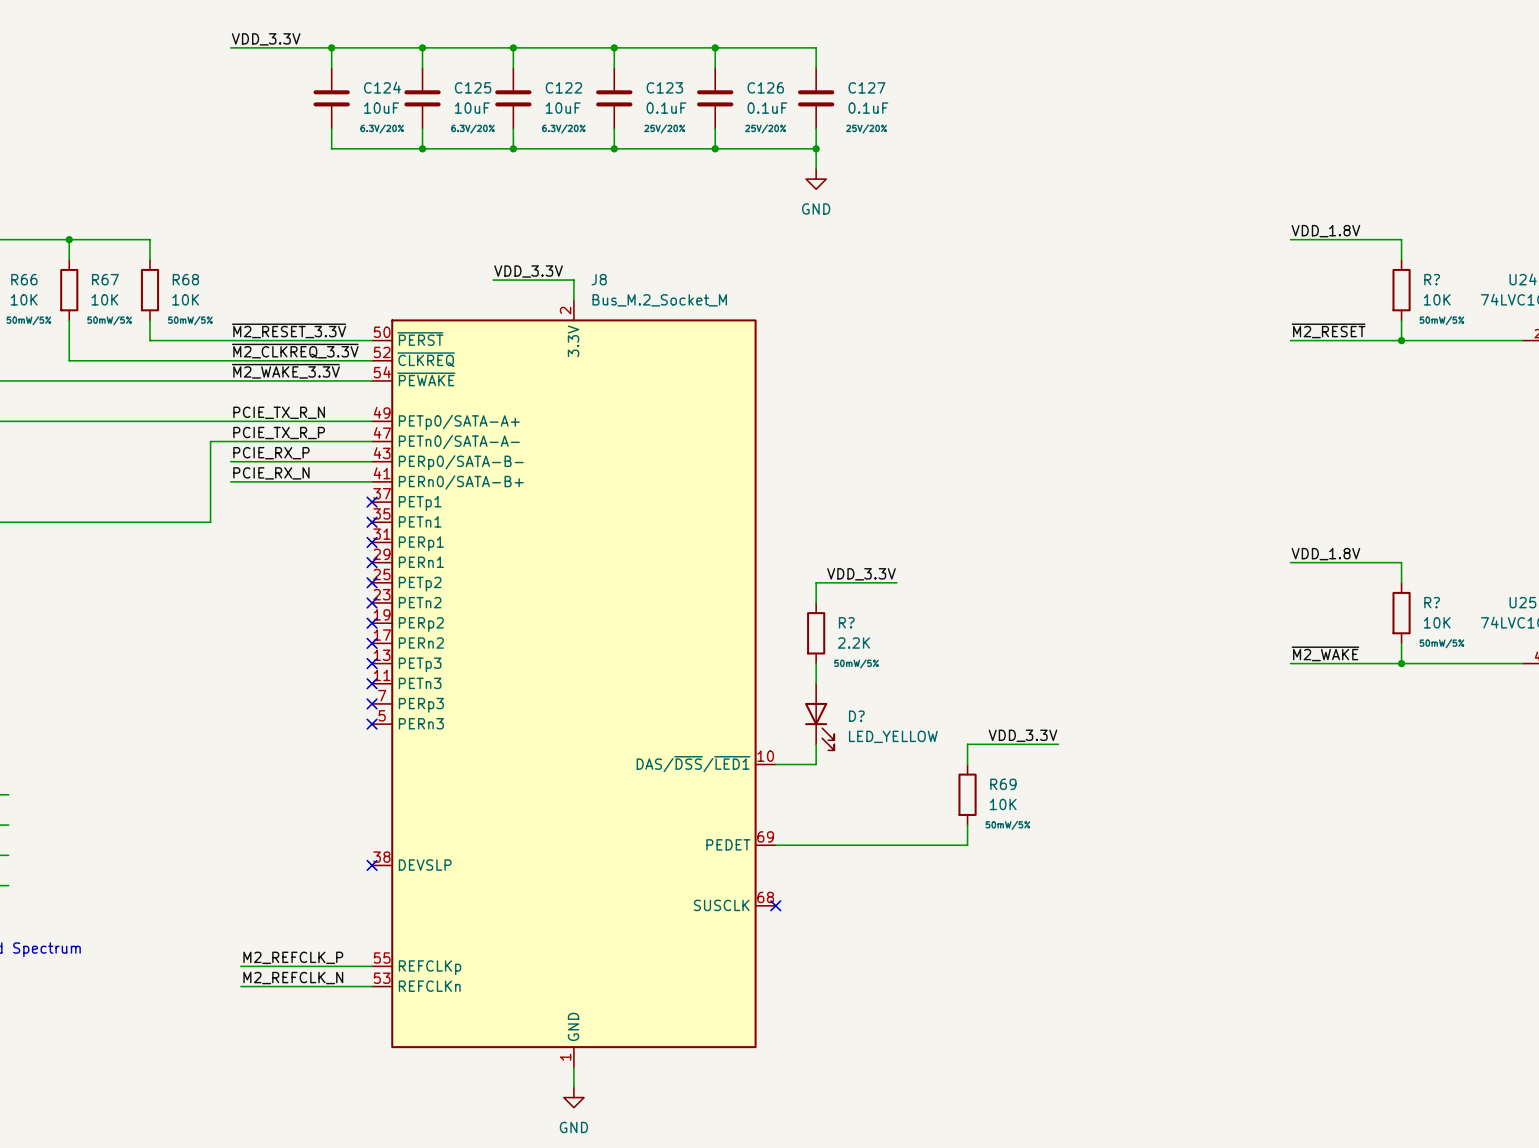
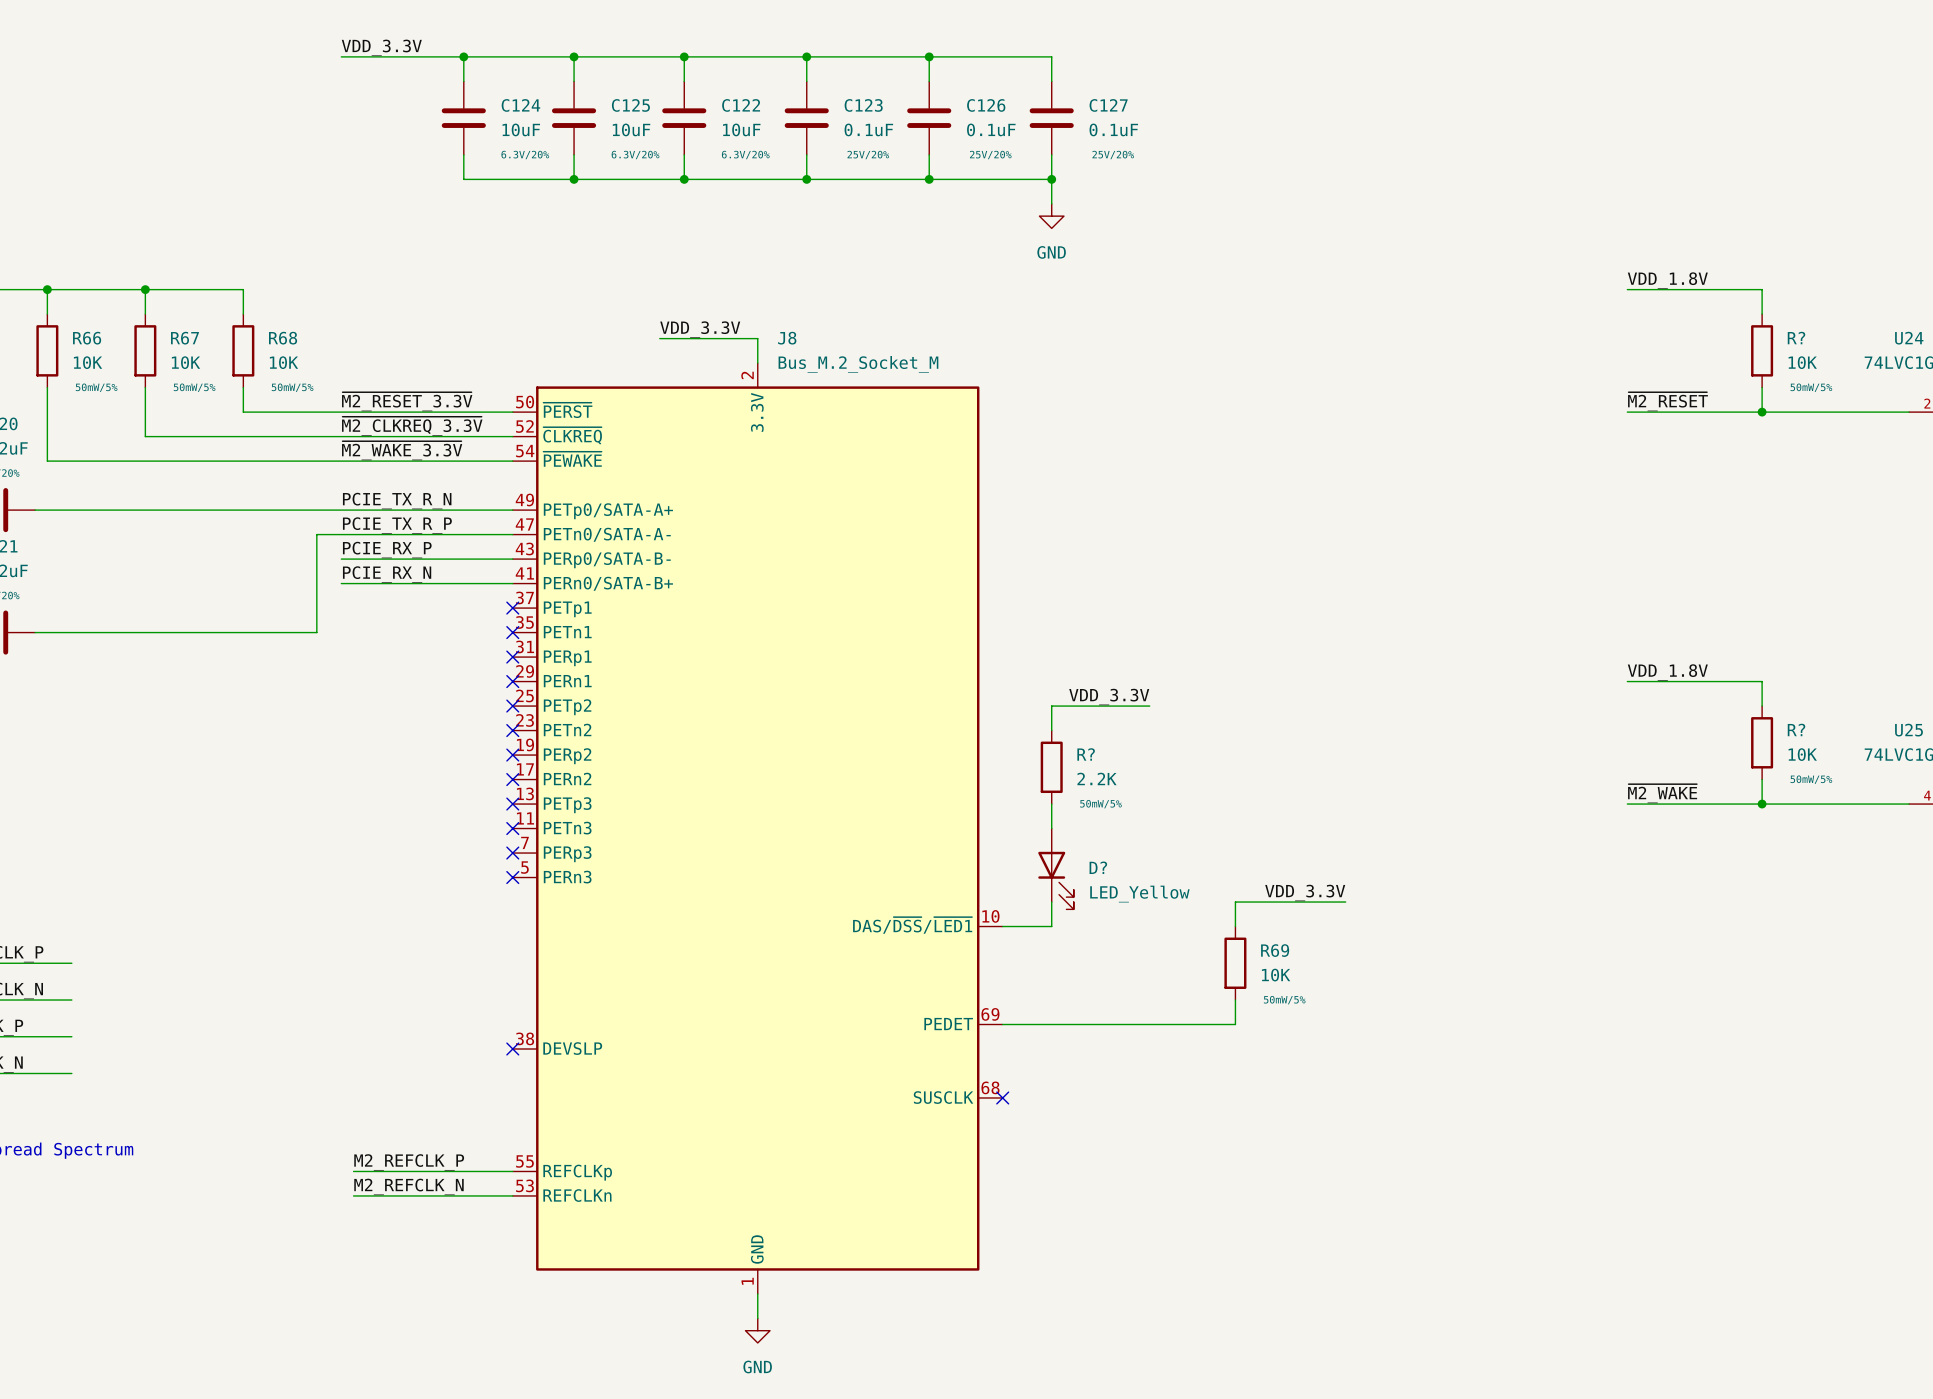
D? value: LED_YELLOW (893, 736) -> LED_Yellow (1139, 894)

